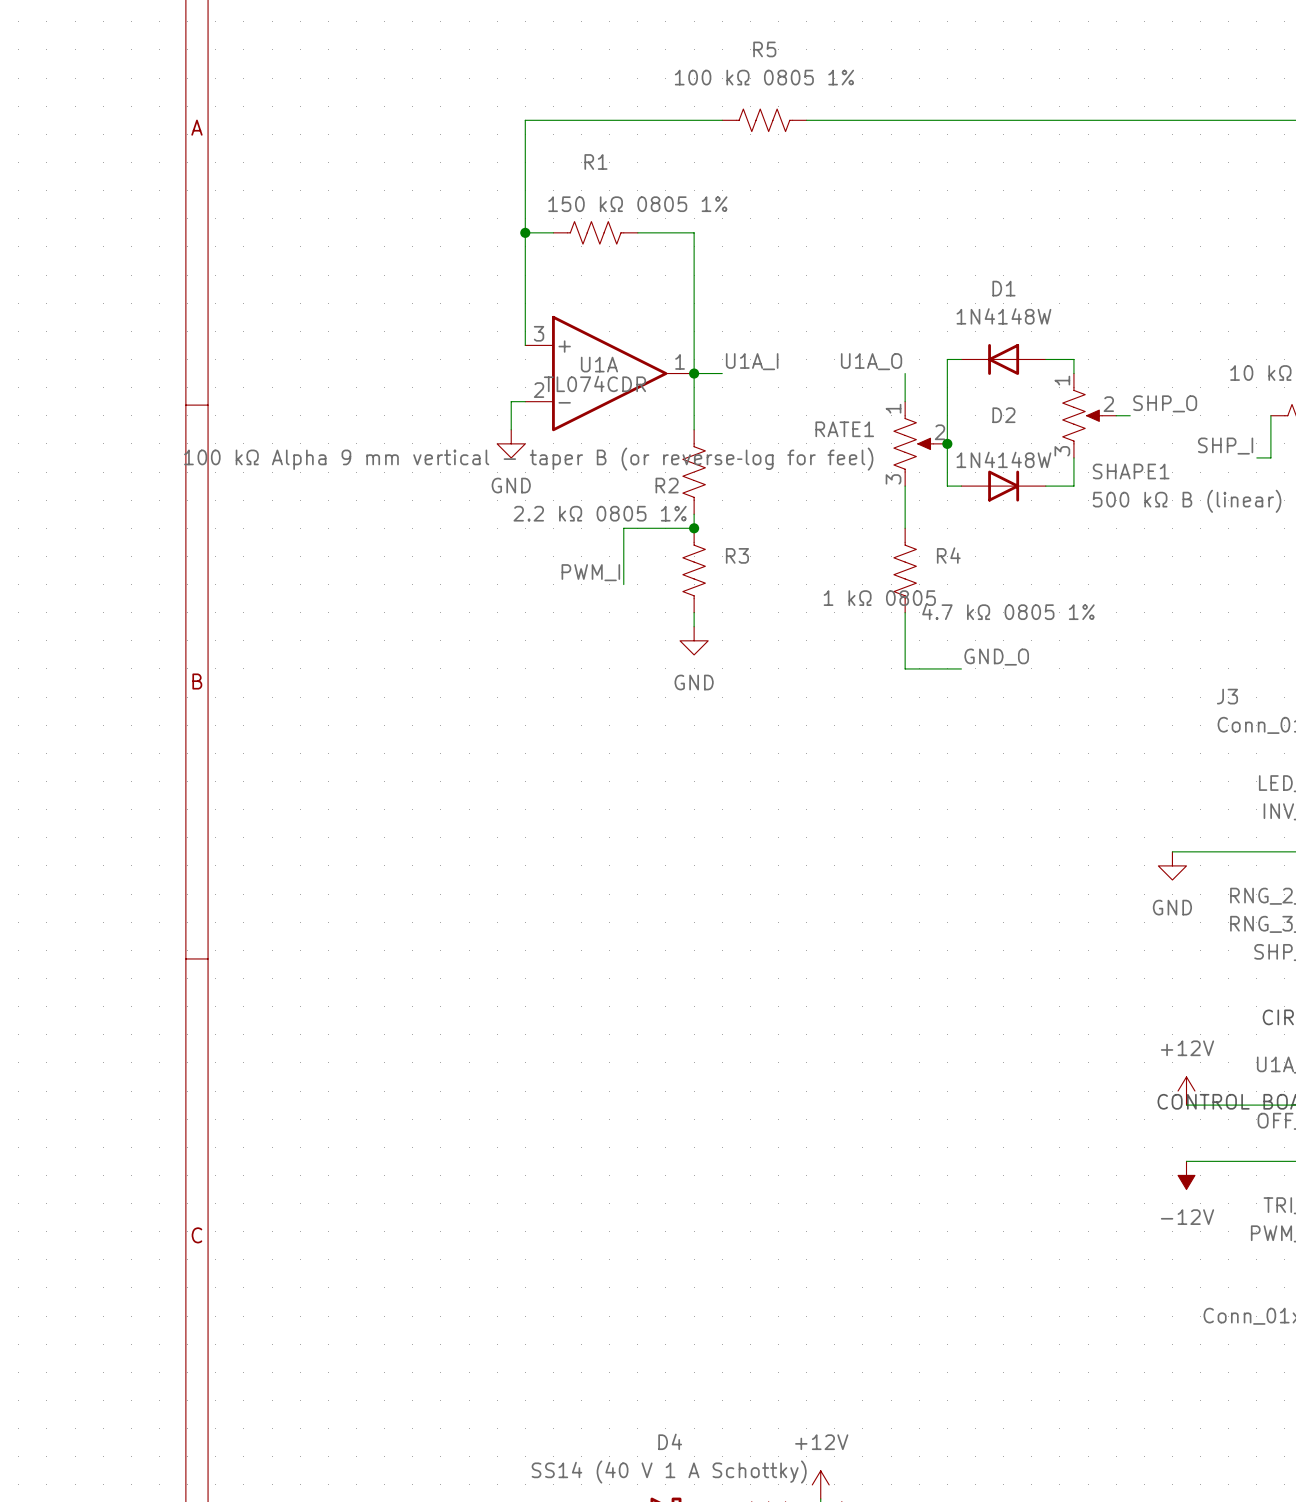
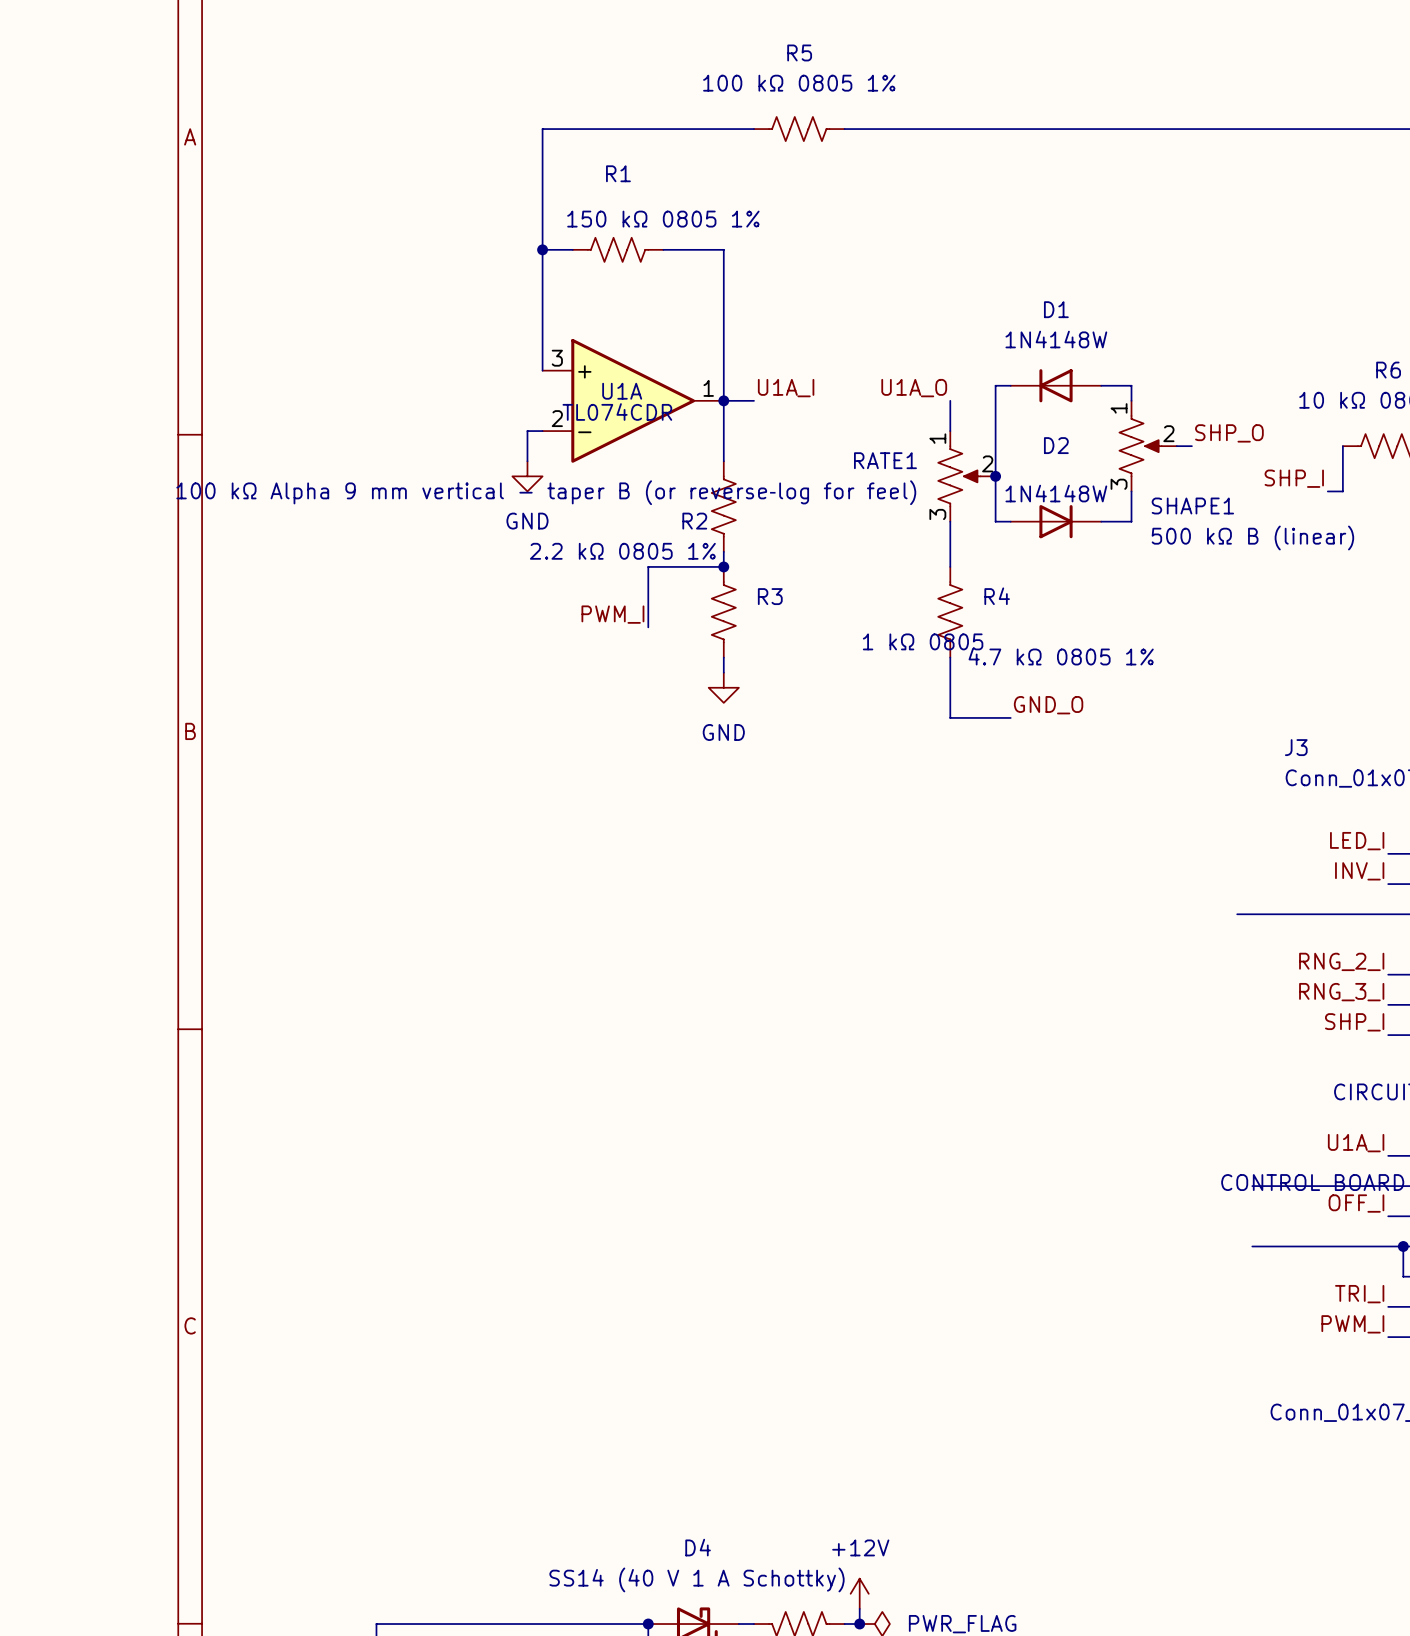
power symbol: GND (1172, 865) -> none
power symbol: +12V (1186, 1091) -> none
power symbol: -12V (1186, 1175) -> none

